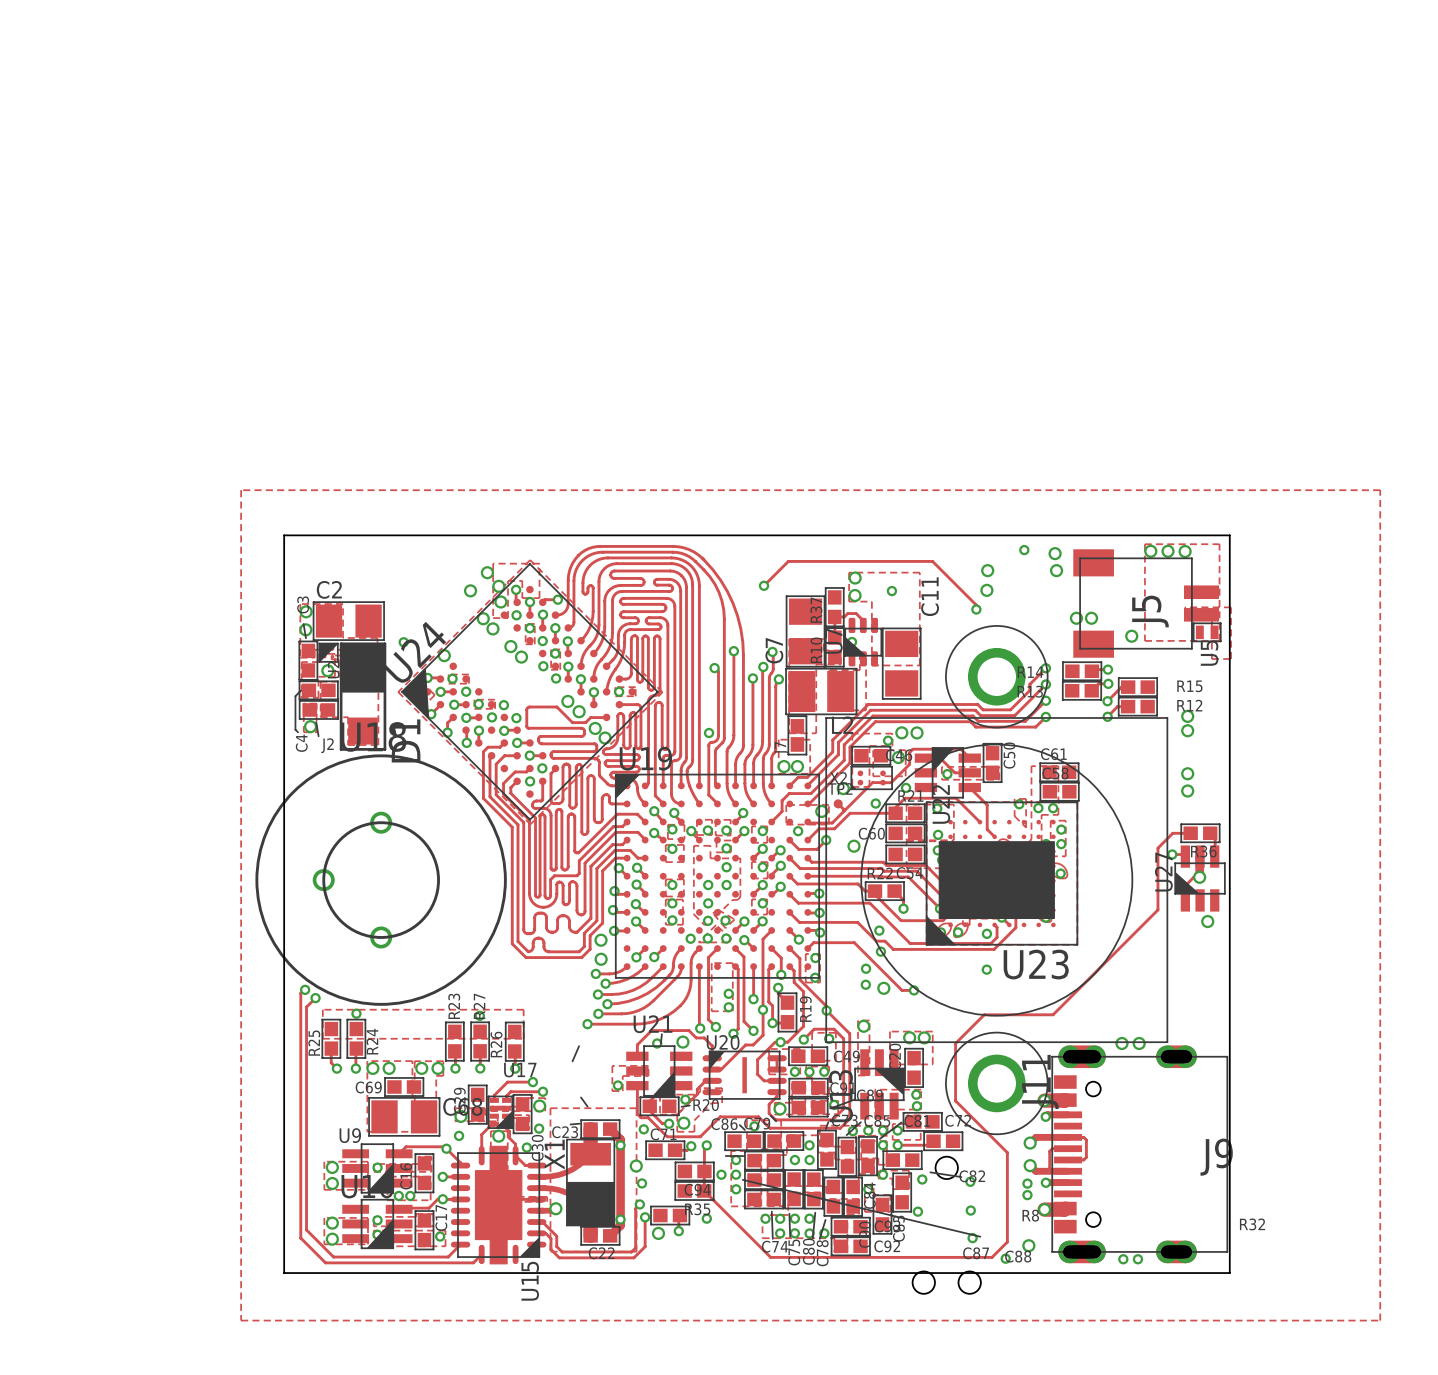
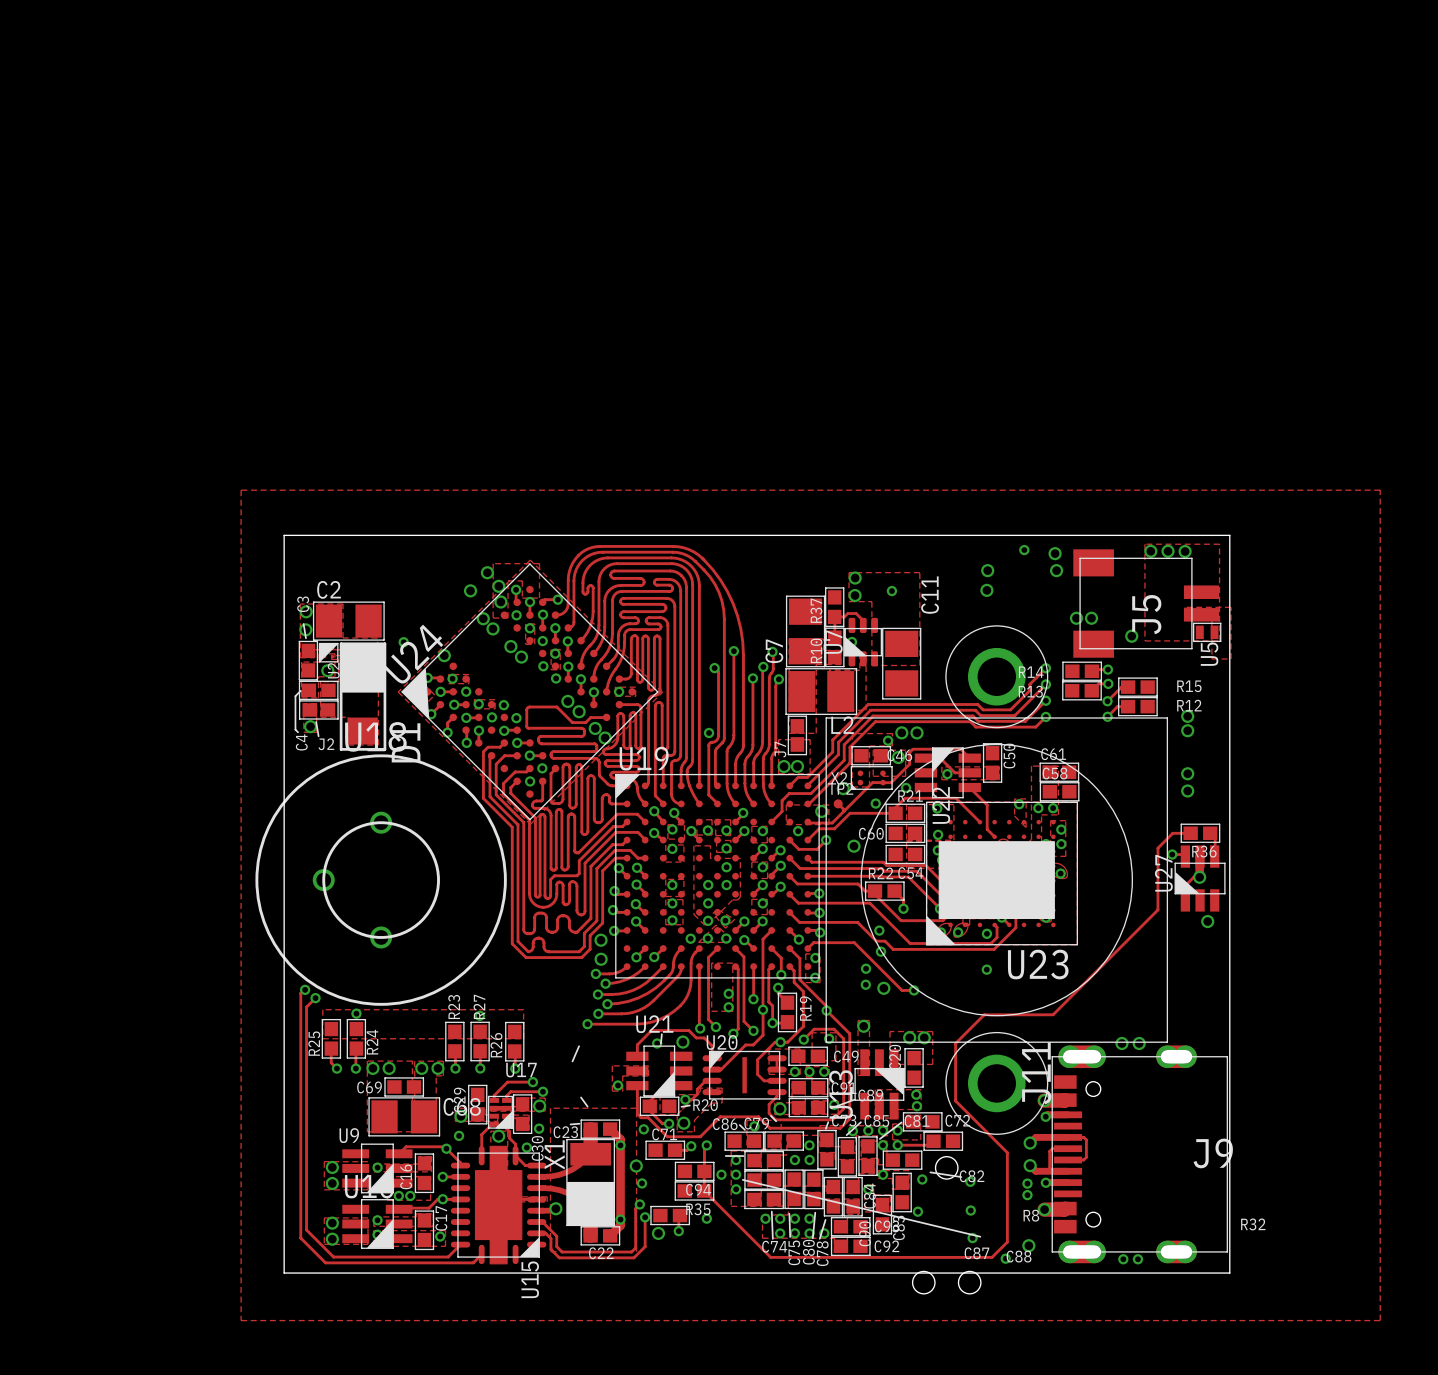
track: (764, 585) (788, 561) (932, 561) (976, 605) (976, 609) -> none
via: (764, 585) -> none
via: (976, 609) -> none

